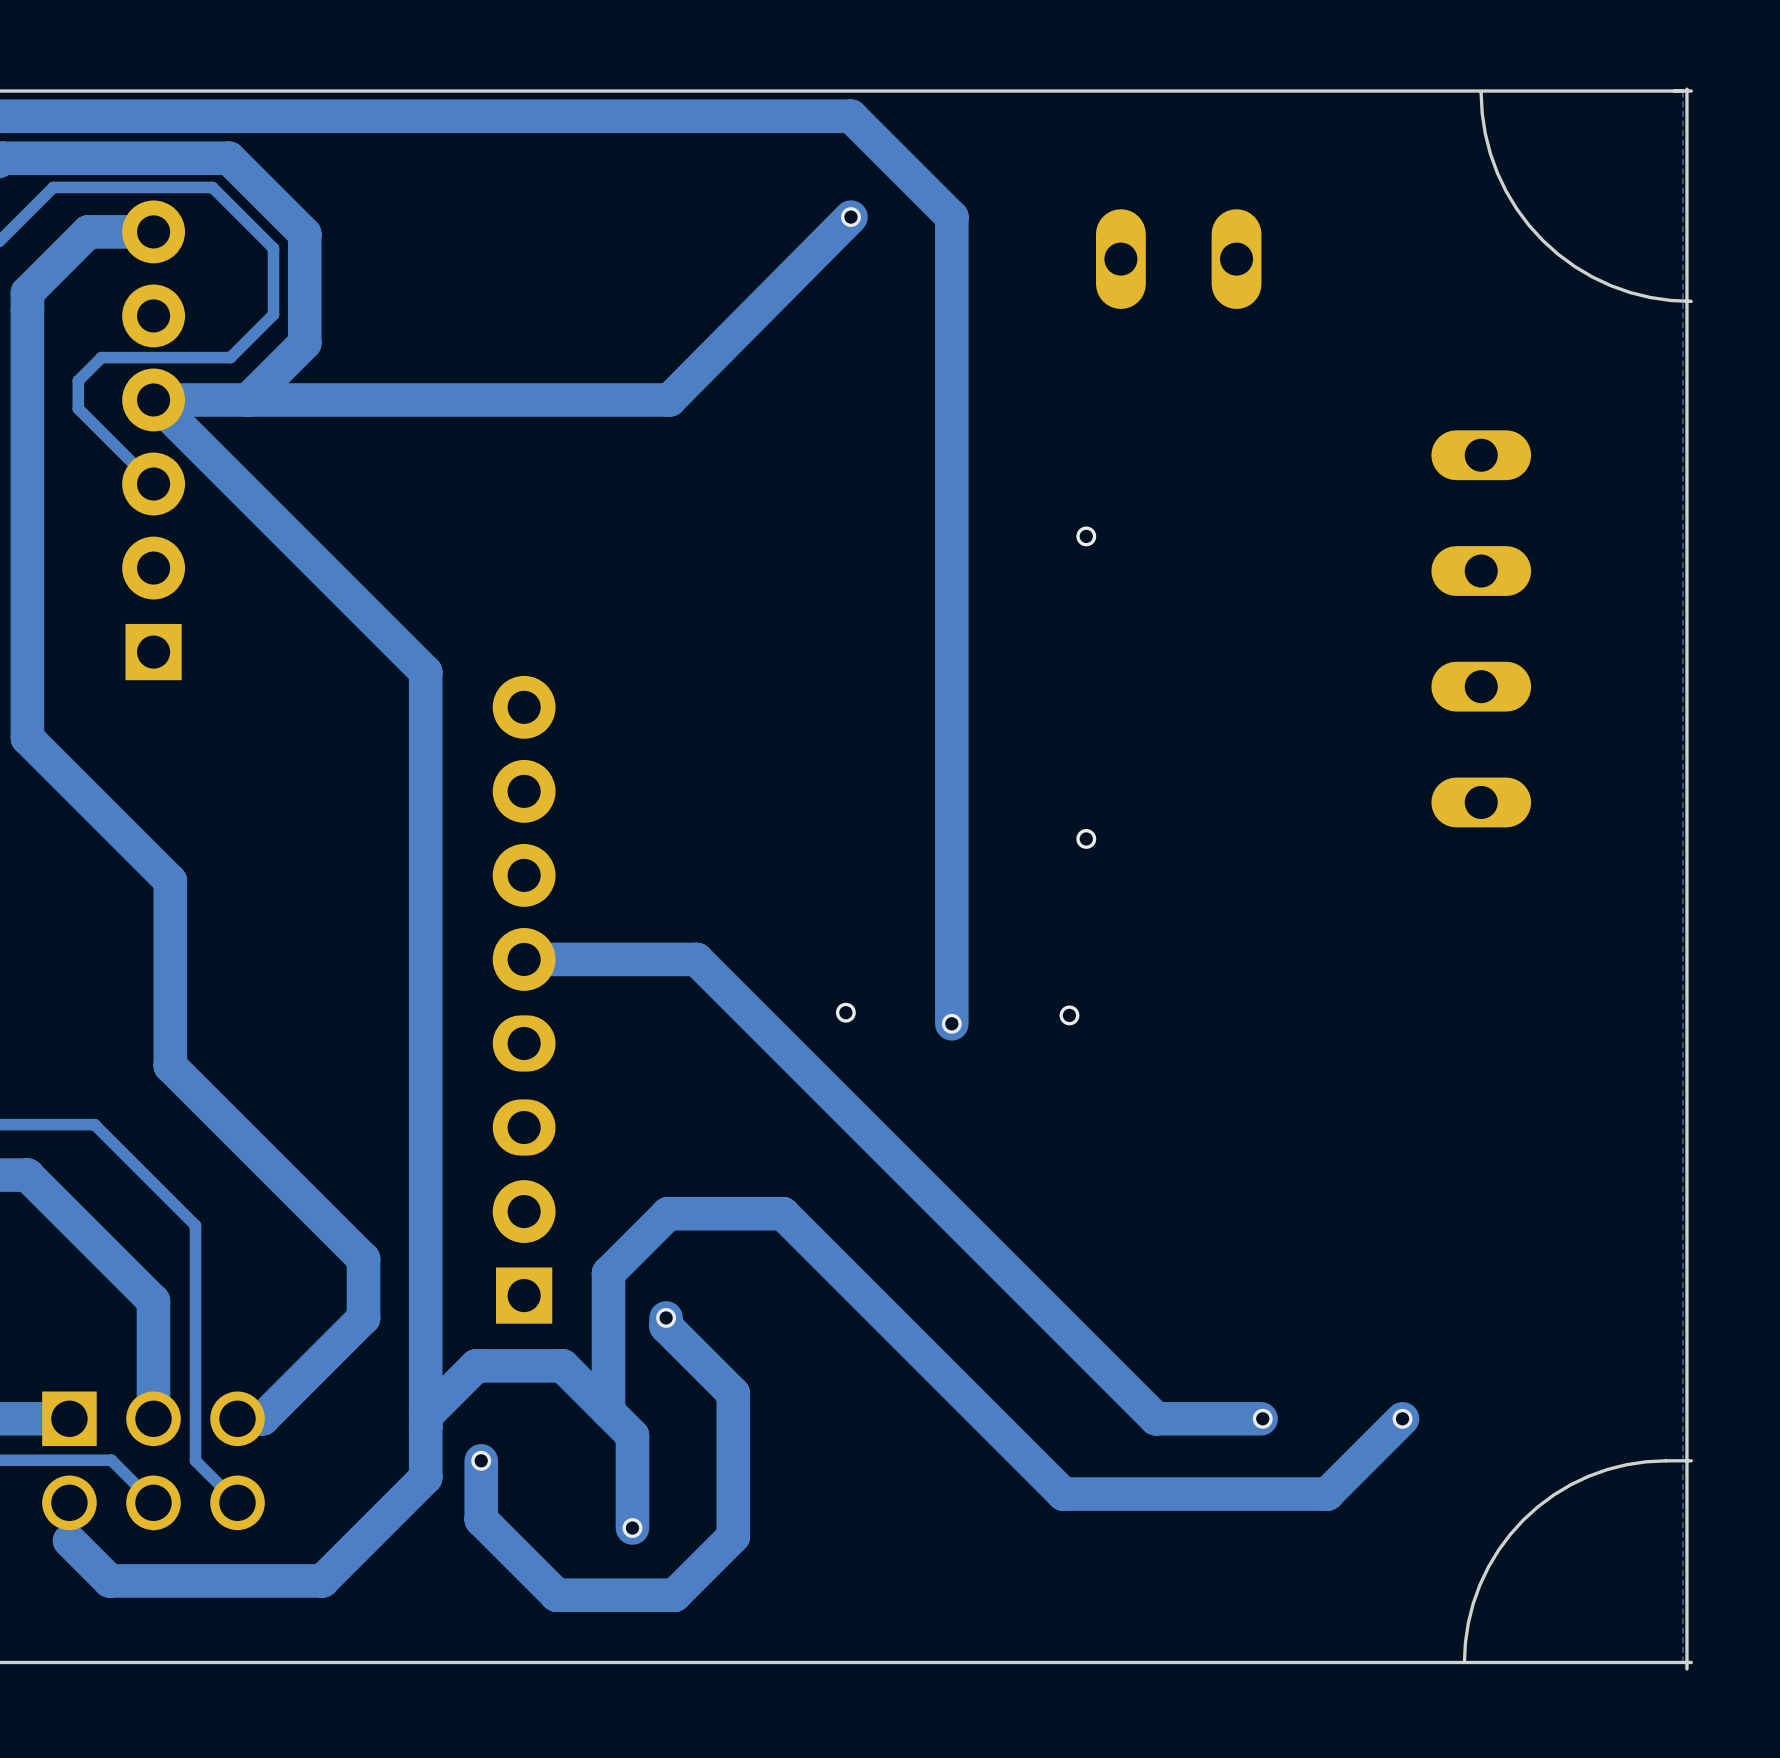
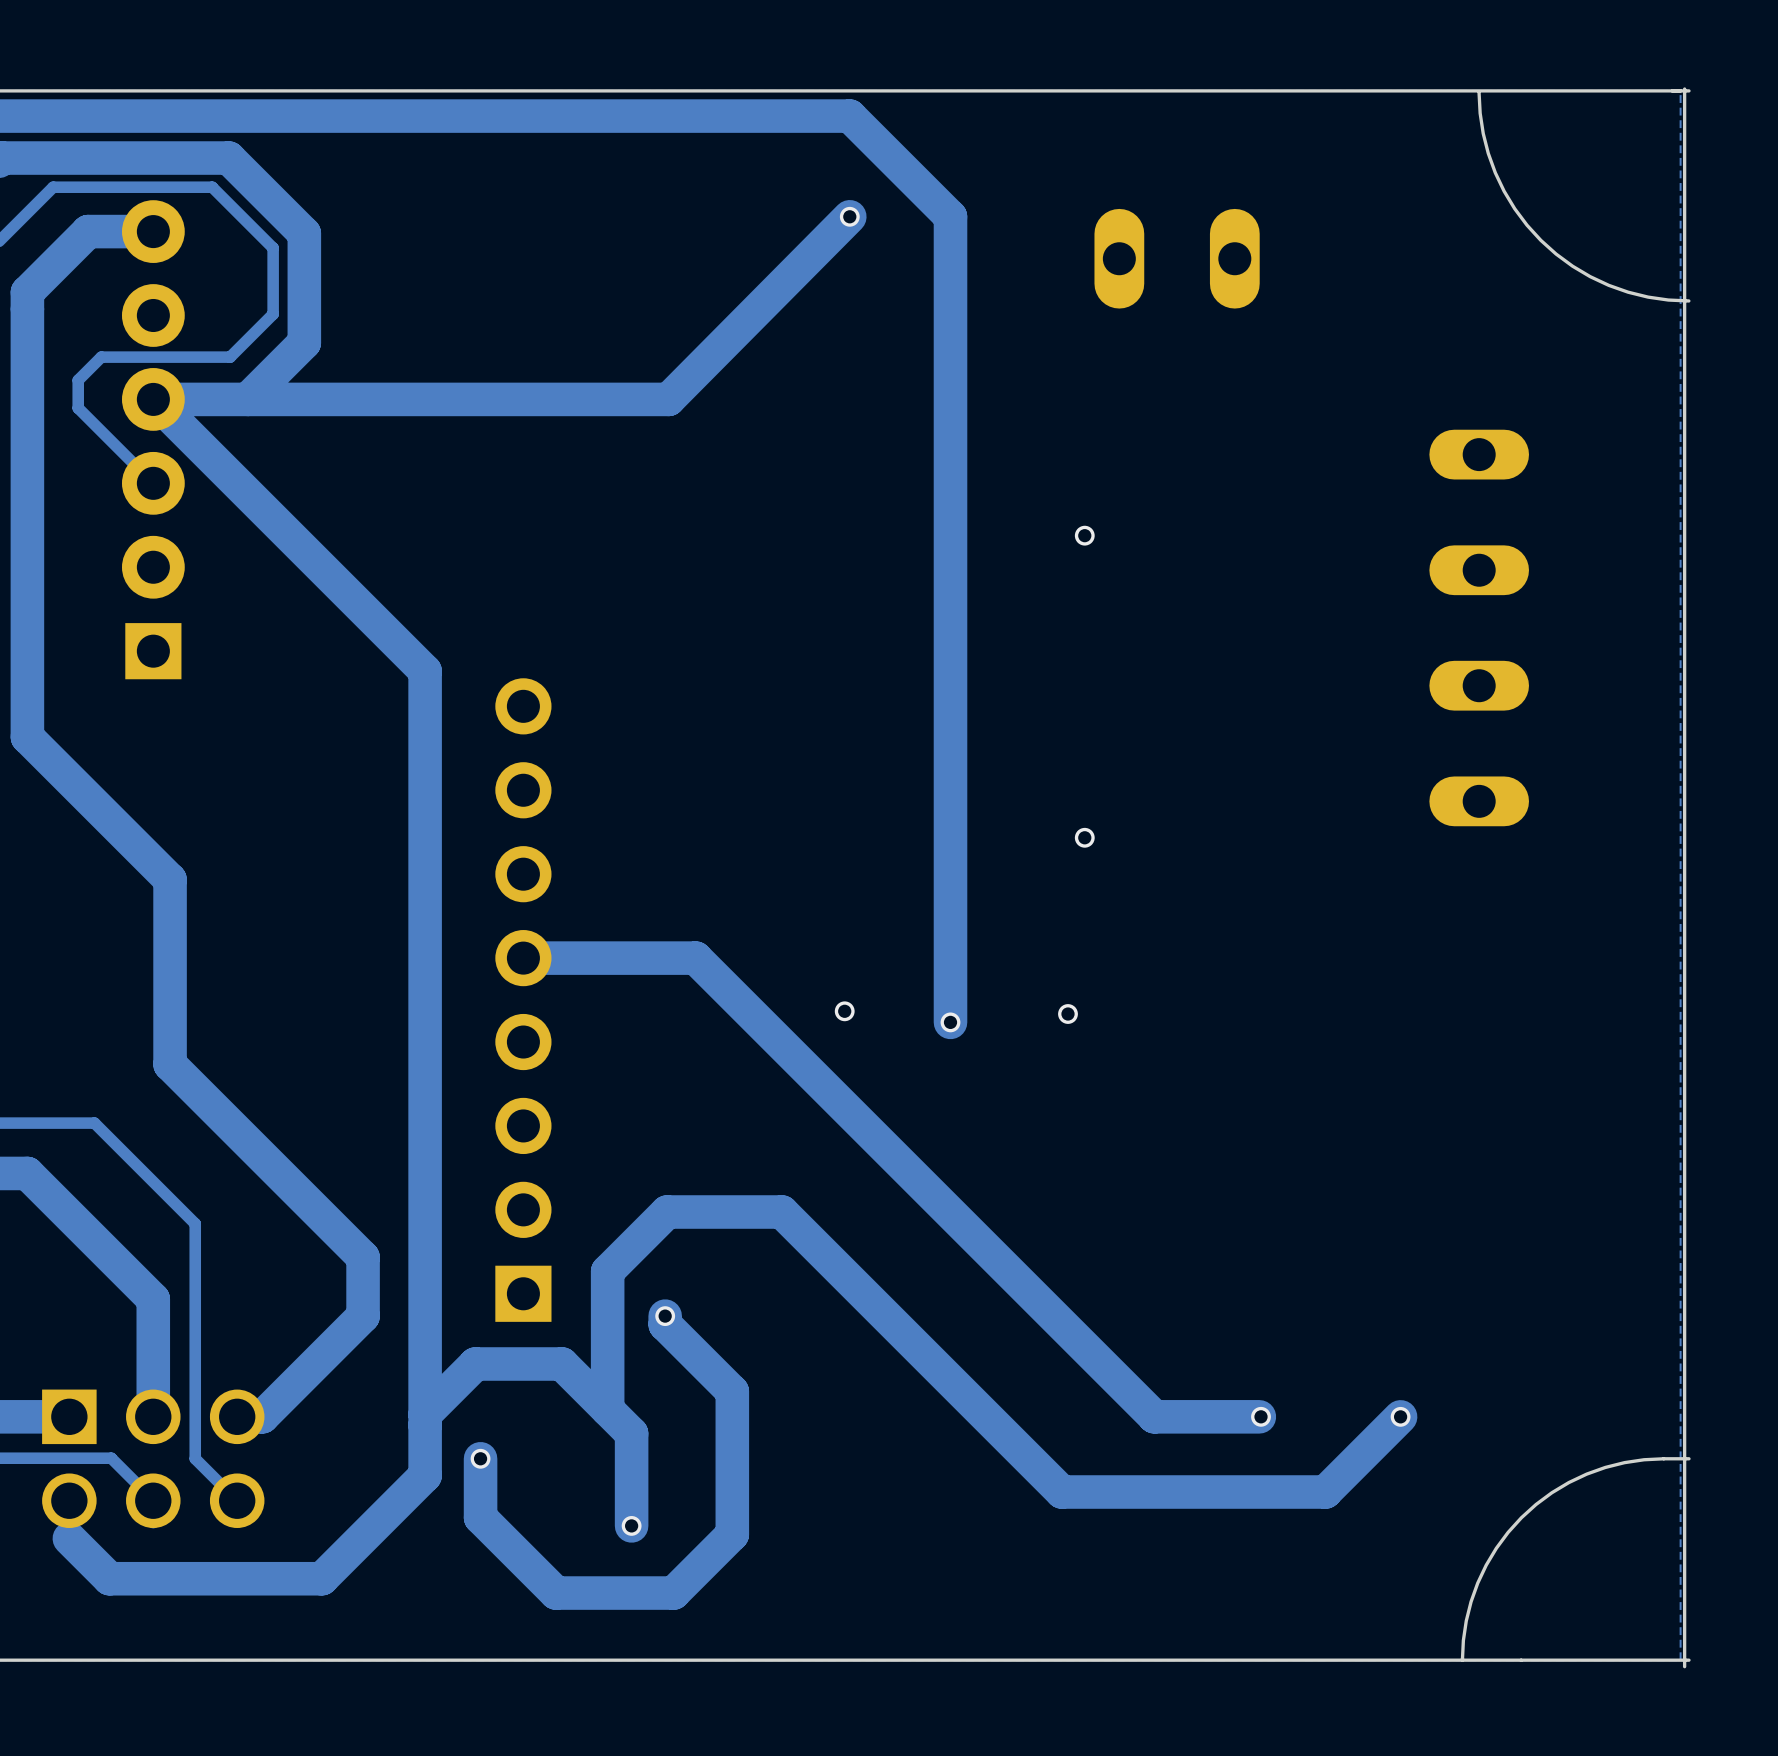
part footprint: [492, 675, 556, 1324] -> [495, 678, 552, 1322]

